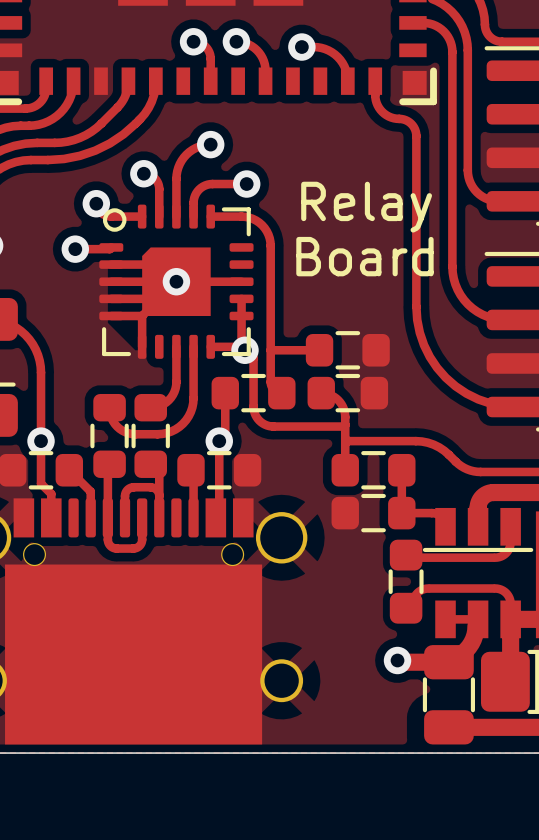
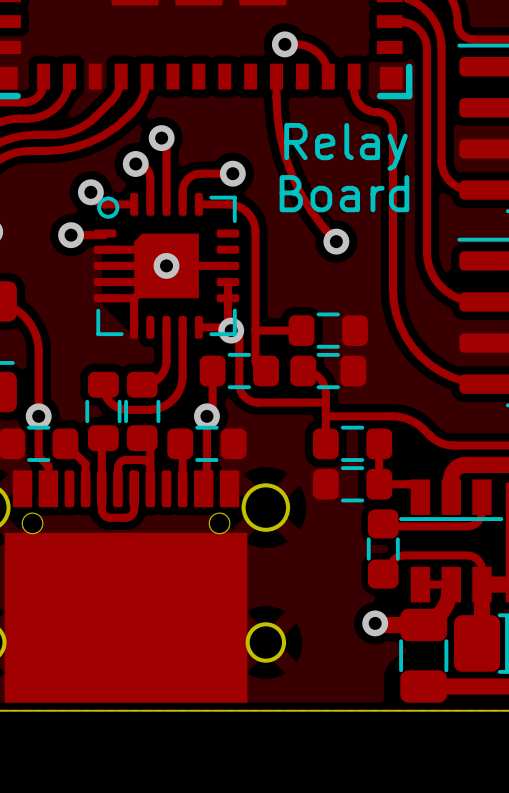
track: (193, 41) (203, 45) (209, 52) (210, 81) -> none
via: (193, 41) -> none
track: (236, 41) (249, 44) (259, 52) (264, 64) (265, 81) -> none
via: (236, 41) -> none
track: none -> (276, 76) (277, 117) (280, 136) (292, 175) (310, 210) (336, 241)
track: (210, 144) (195, 148) (186, 154) (179, 164) (176, 178) -> (161, 138) (166, 142) (166, 168)
via position: (210, 144) -> (161, 138)
text: none -> Relay (346, 146)
text: Relay (366, 207) -> Board (344, 193)
via: none -> (336, 241)
text: Board (364, 256) -> none

